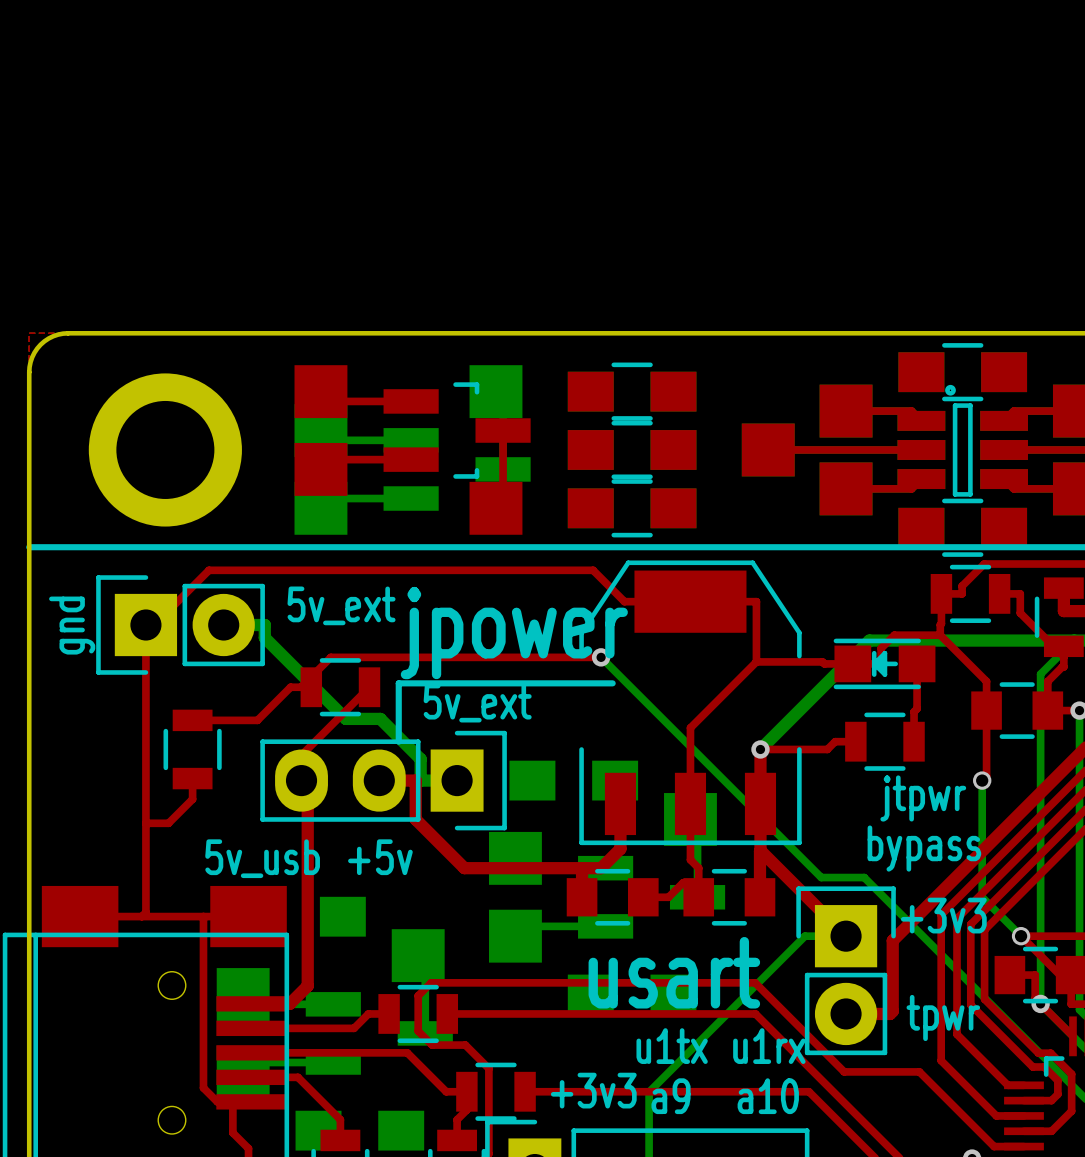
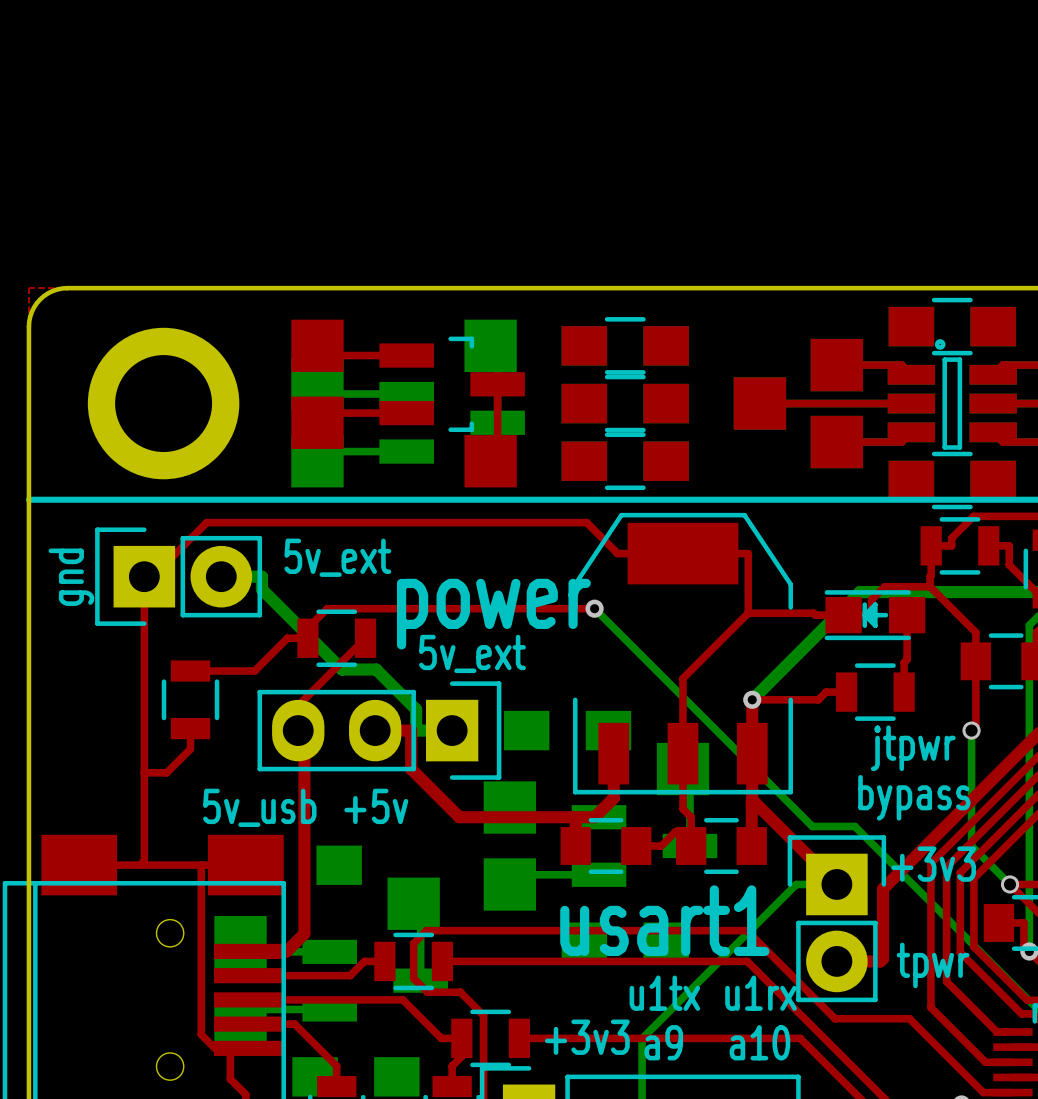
text: jpower (514, 633) -> power (493, 614)
line: (612, 683) (398, 683) (398, 741) -> none
text: usart (674, 972) -> usart1 (664, 920)

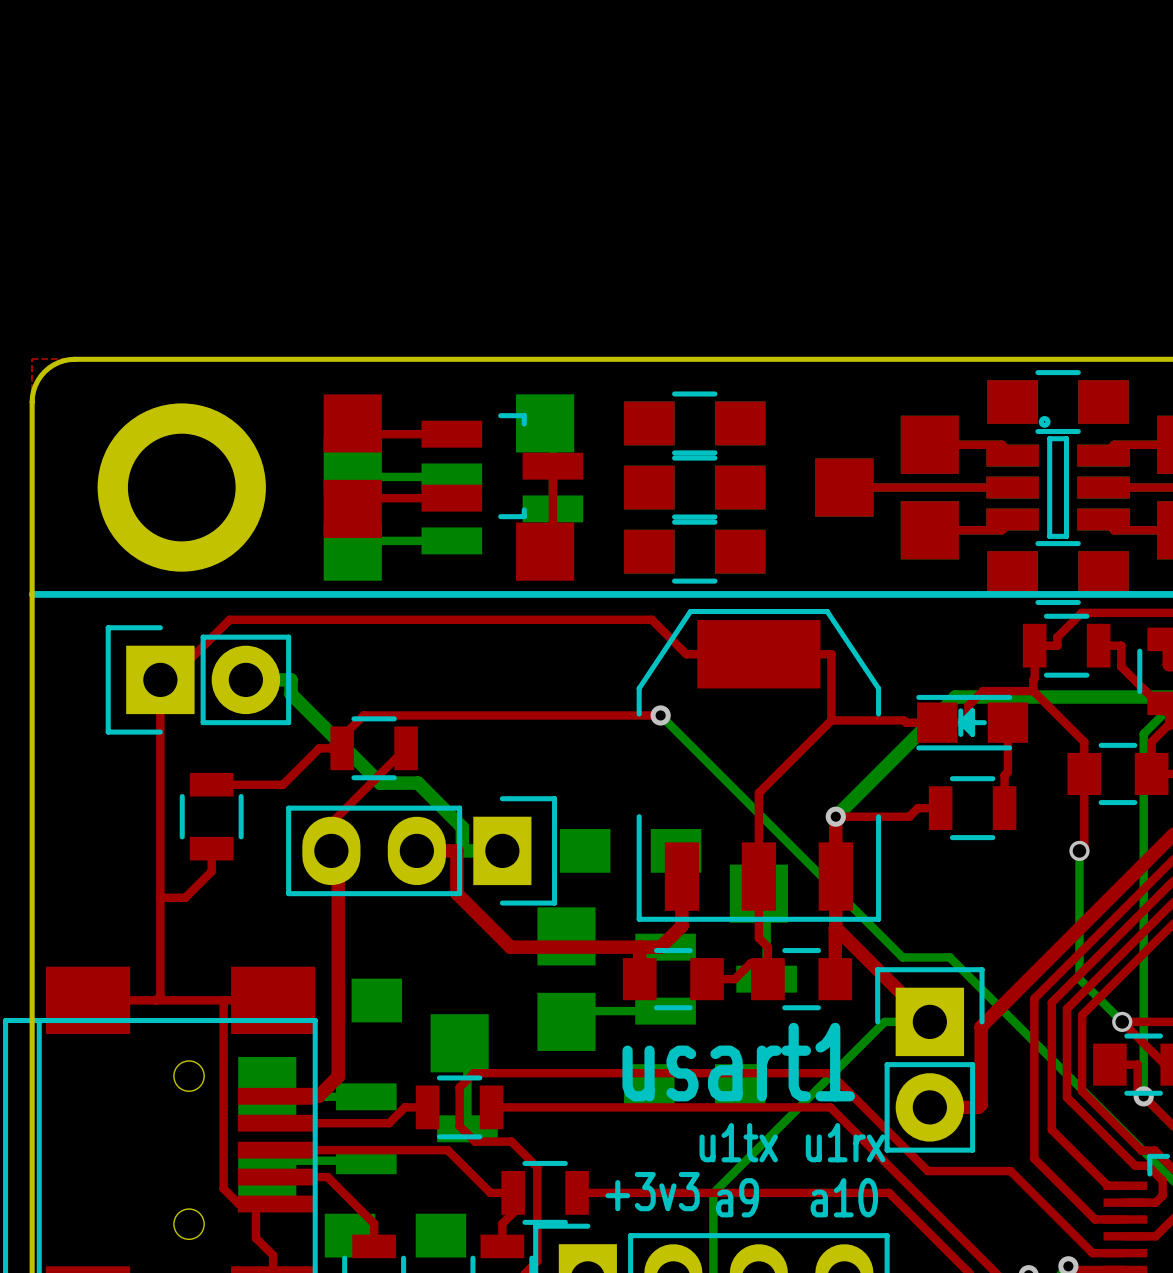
text: 5v_ext (337, 557) -> none
text: gnd (71, 577) -> none
text: power (493, 614) -> none
text: 5v_ext (472, 653) -> none
text: jtpwr (913, 748) -> none
text: bypass (914, 797) -> none
text: +5v (376, 806) -> none
text: 5v_usb (259, 807) -> none
text: +3v3 (933, 864) -> none
text: tpwr (933, 965) -> none

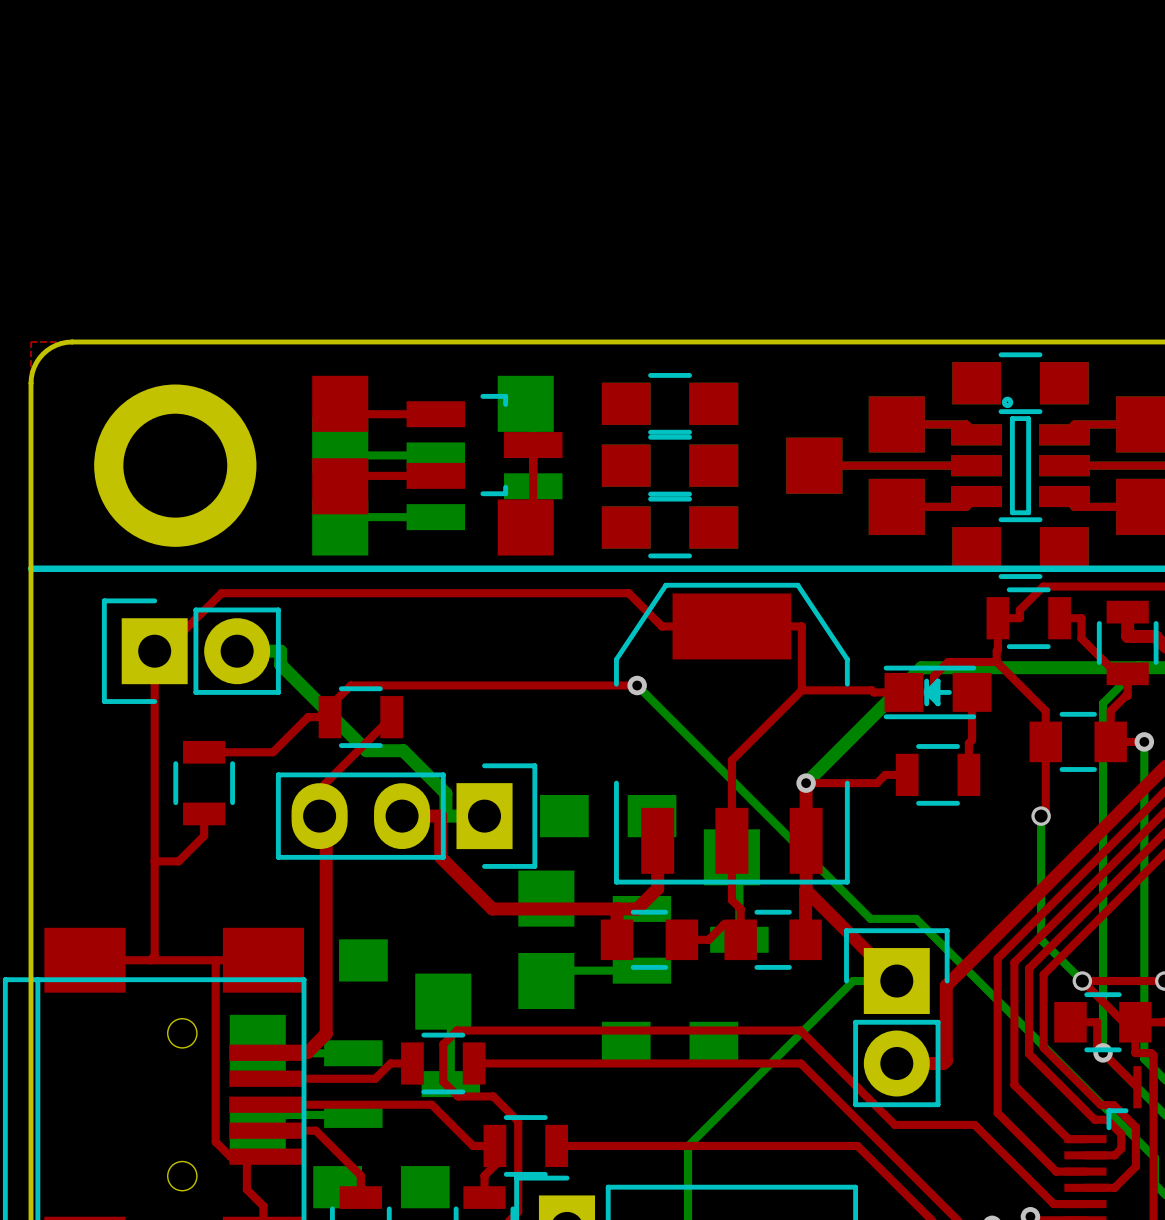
text: usart1 (738, 1062) -> none
text: u1tx (738, 1142) -> none
text: u1rx (845, 1142) -> none
text: +3v3 (652, 1191) -> none
text: a9 (737, 1197) -> none
text: a10 (844, 1197) -> none

